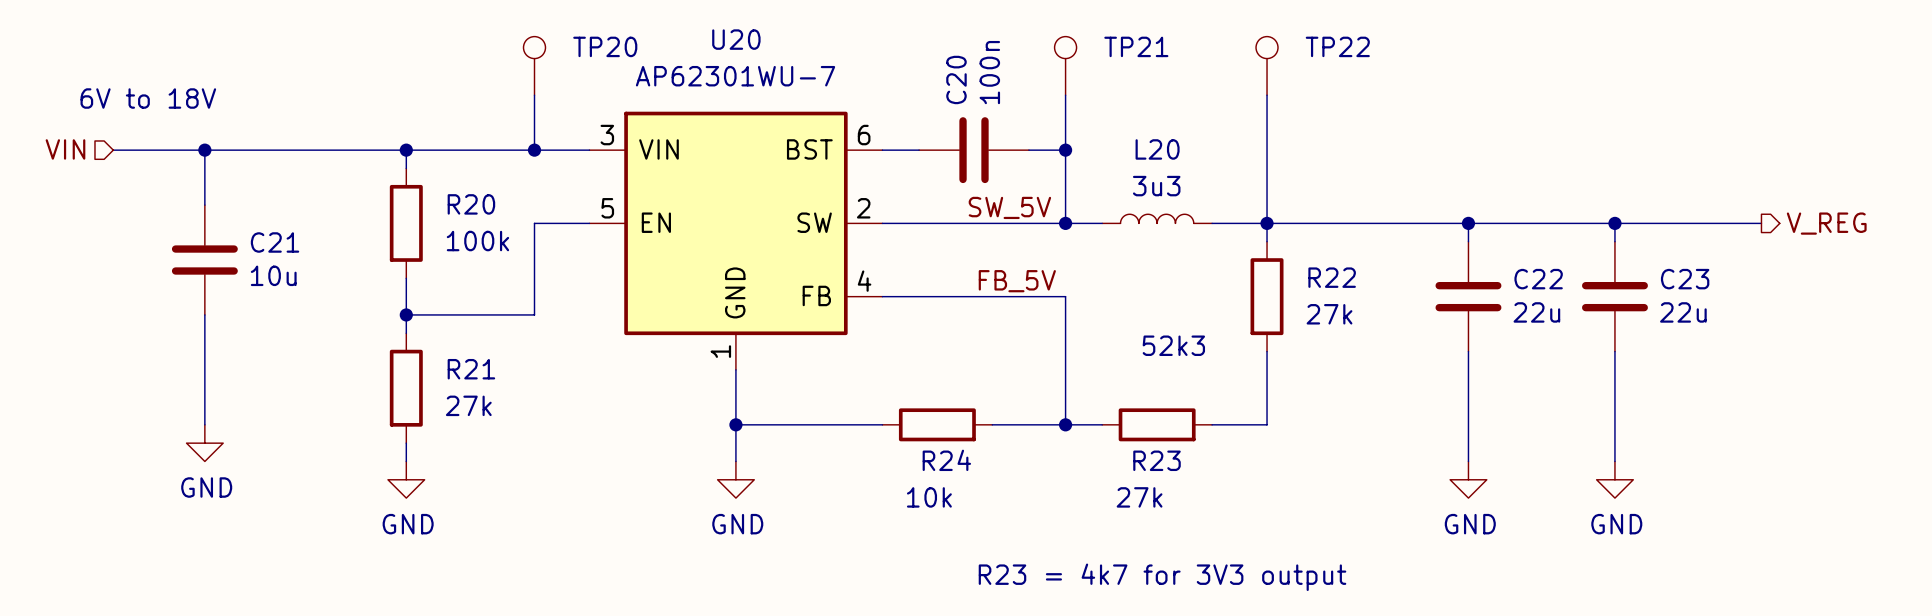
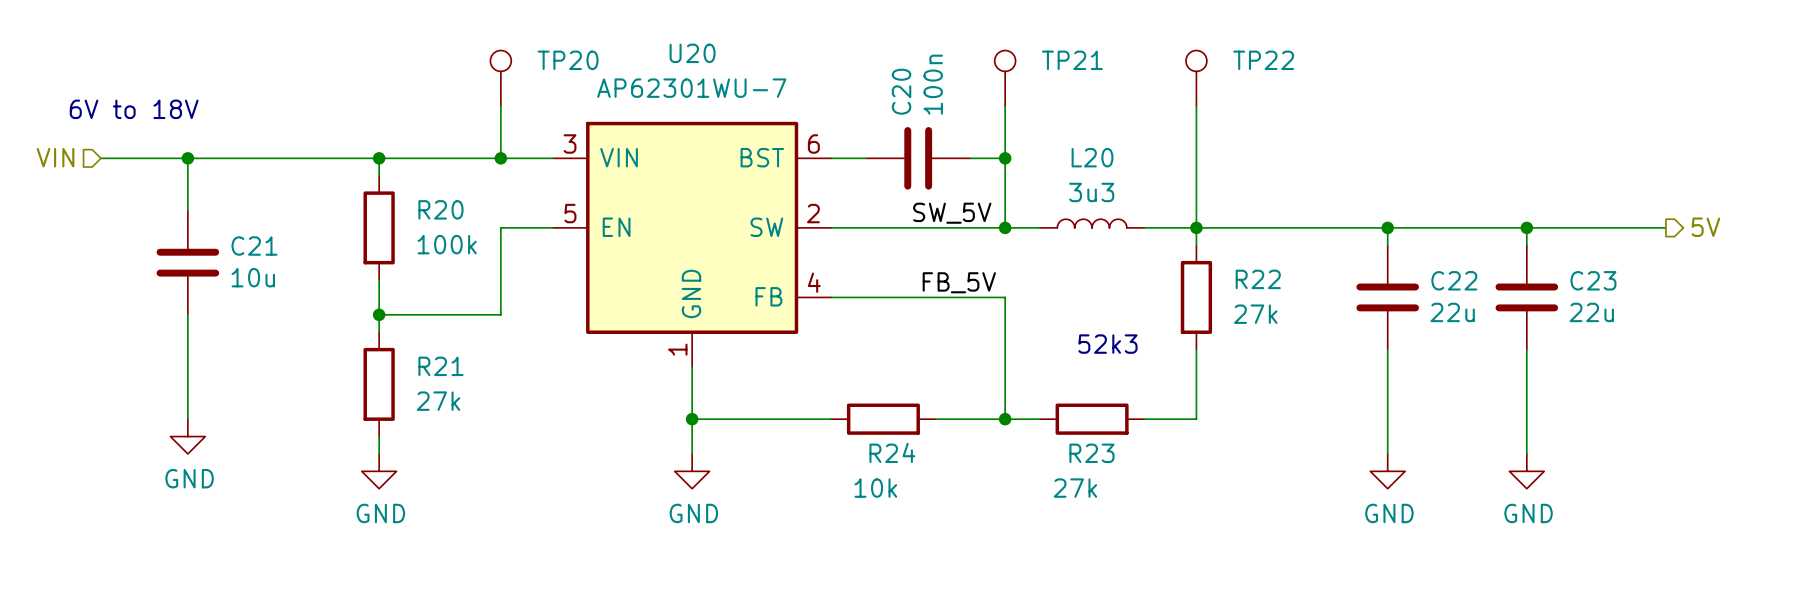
hierarchical label: V_REG (1826, 223) -> 5V (1705, 227)
text: R23 = 4k7 for 3V3 output (1162, 577) -> none

